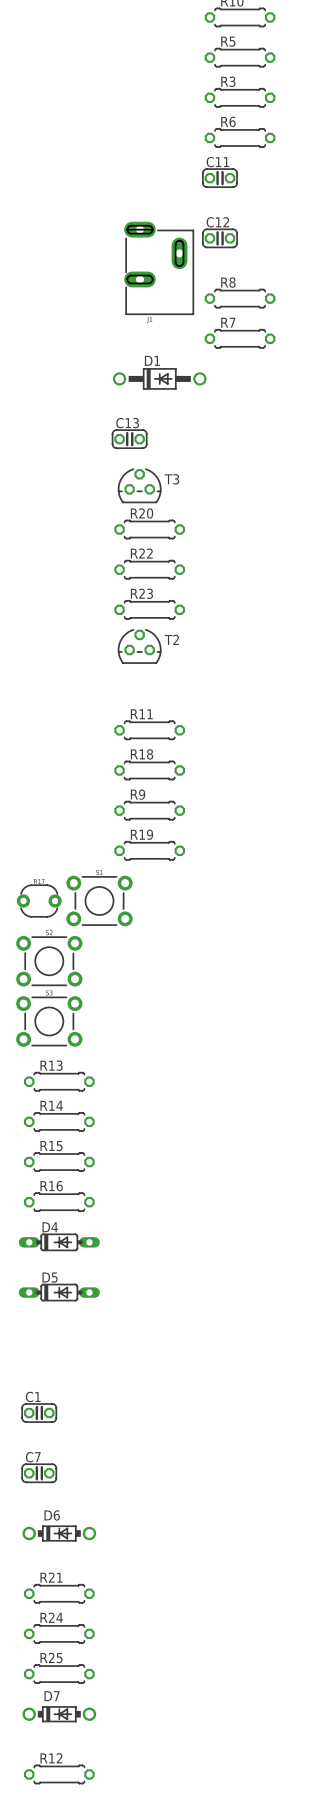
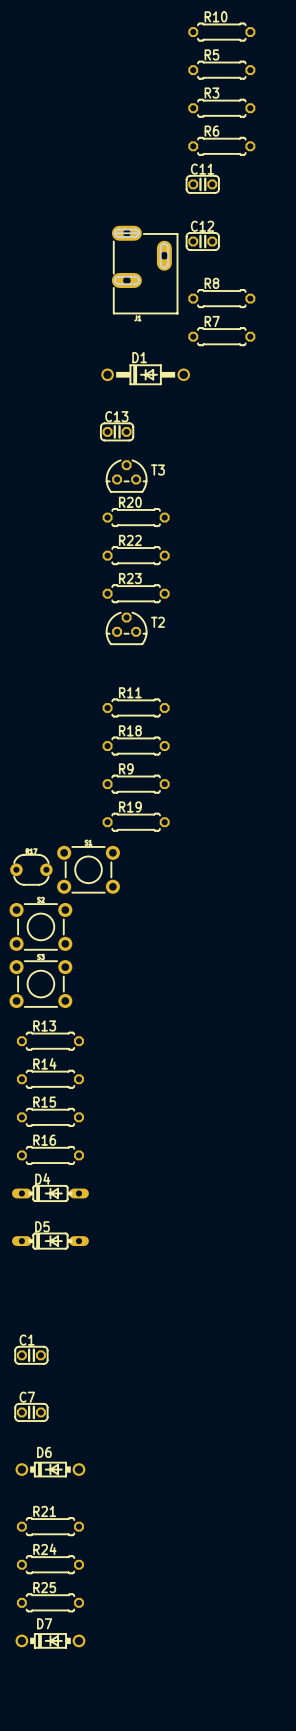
R12: (59, 1774) -> none

